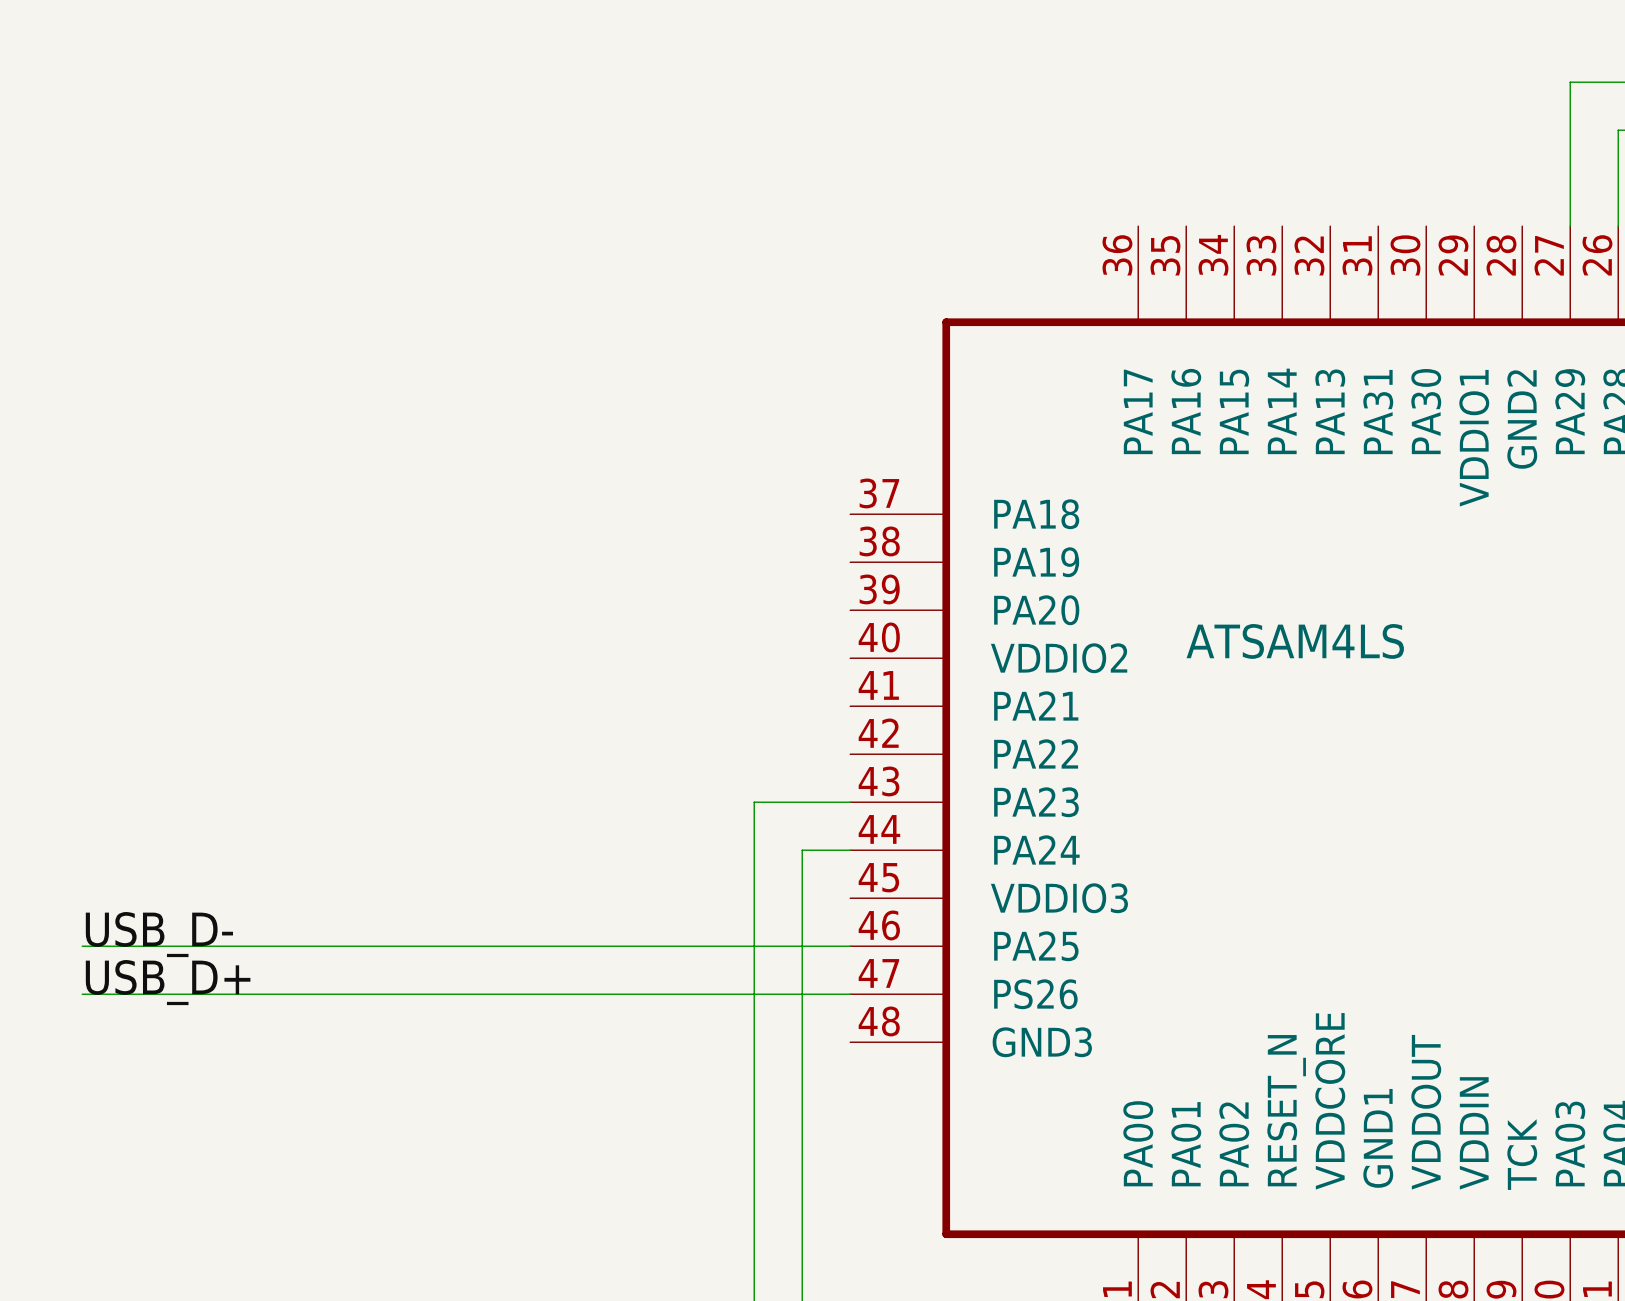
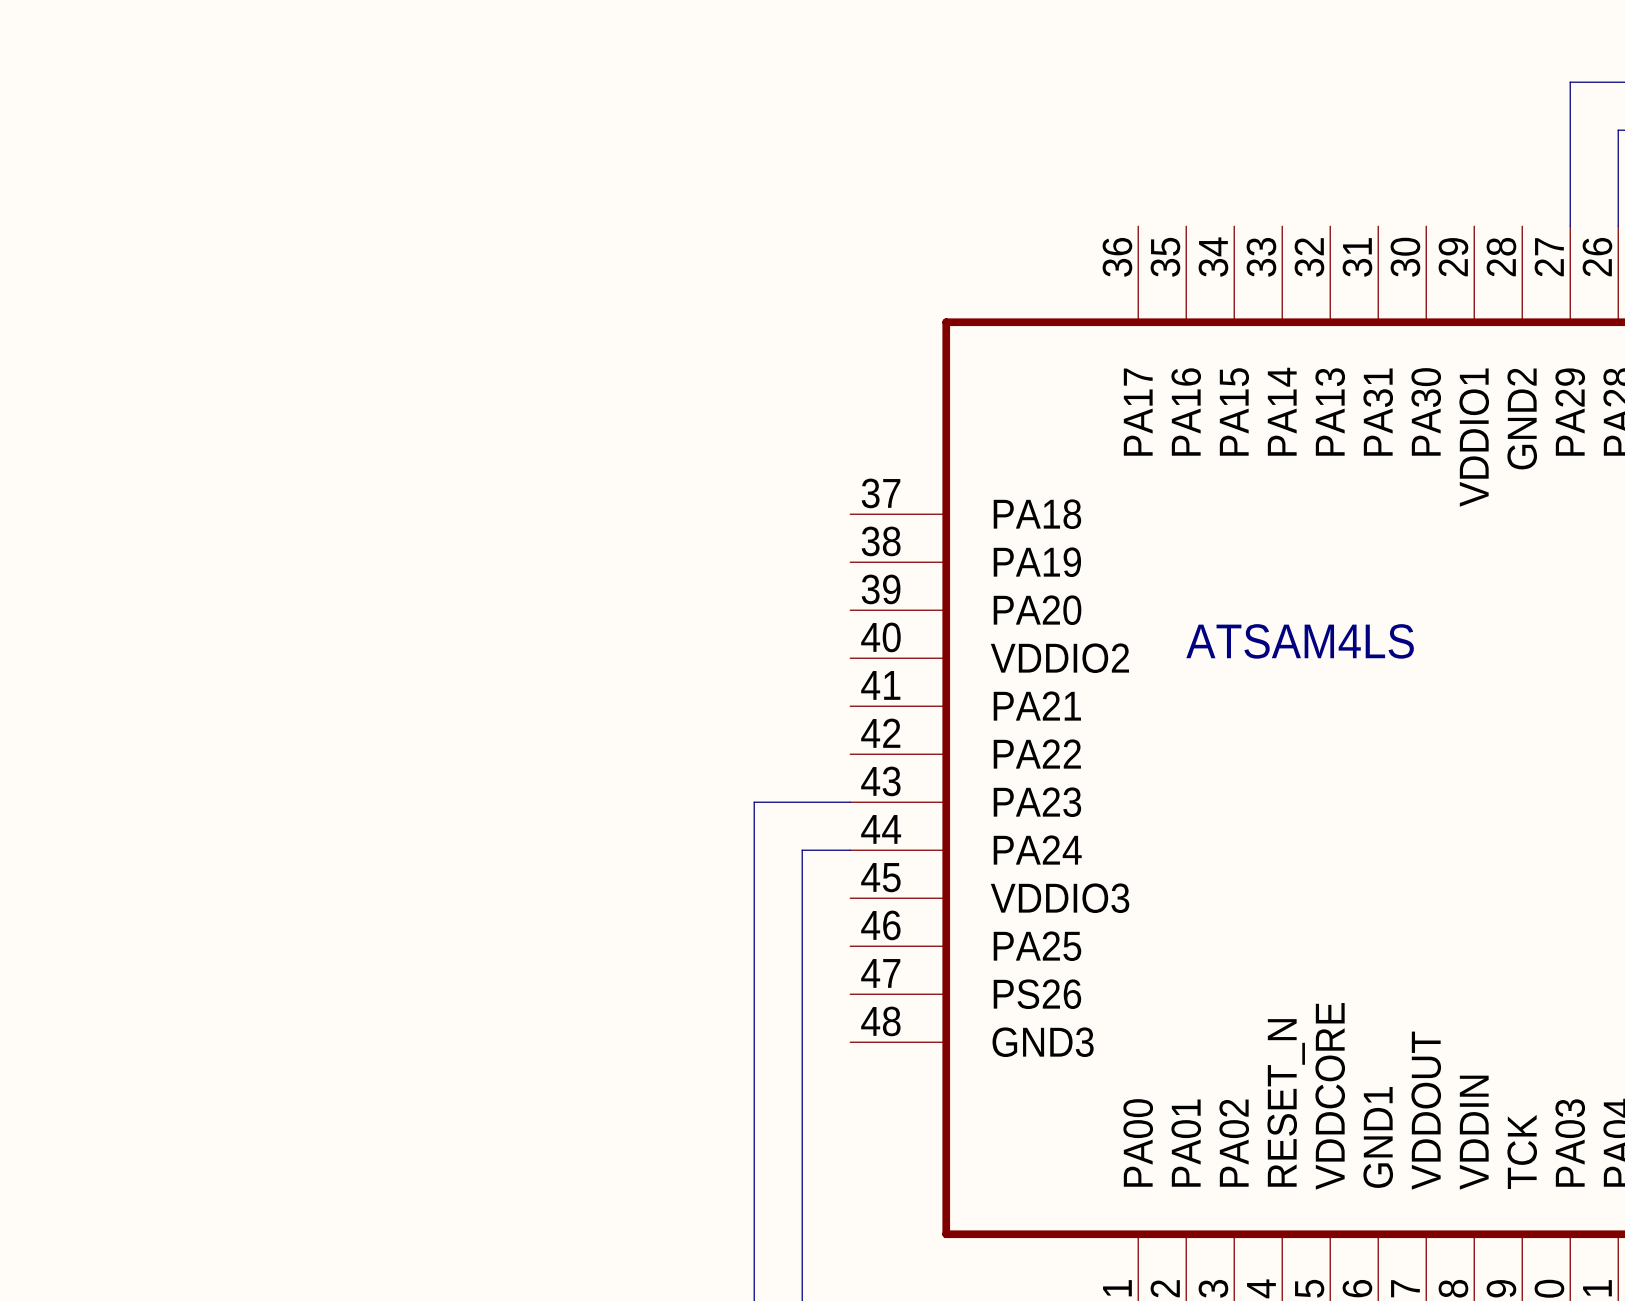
label: USB_D- (159, 934) -> none
wire: (82, 946) (850, 946) -> none
label: USB_D+ (168, 982) -> none
wire: (82, 994) (850, 994) -> none

